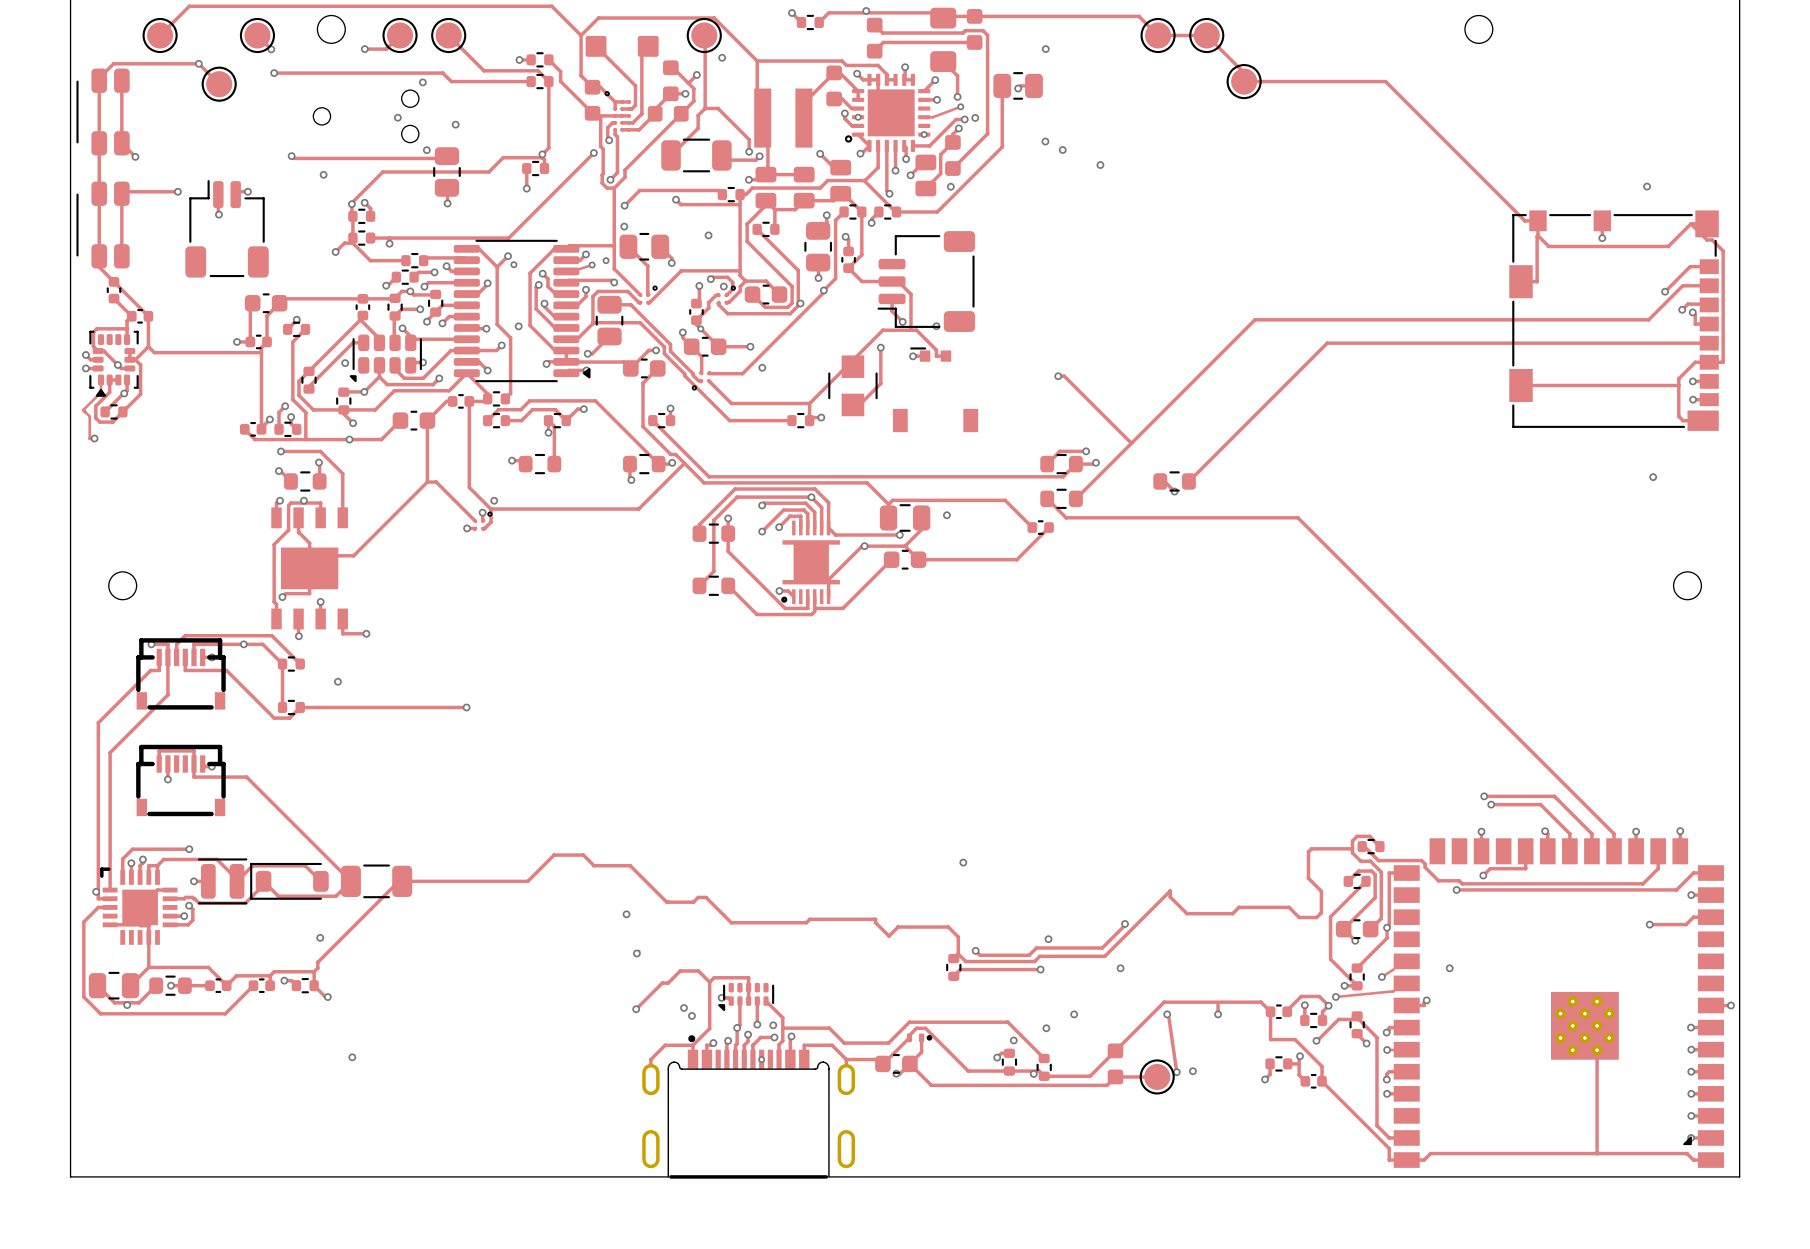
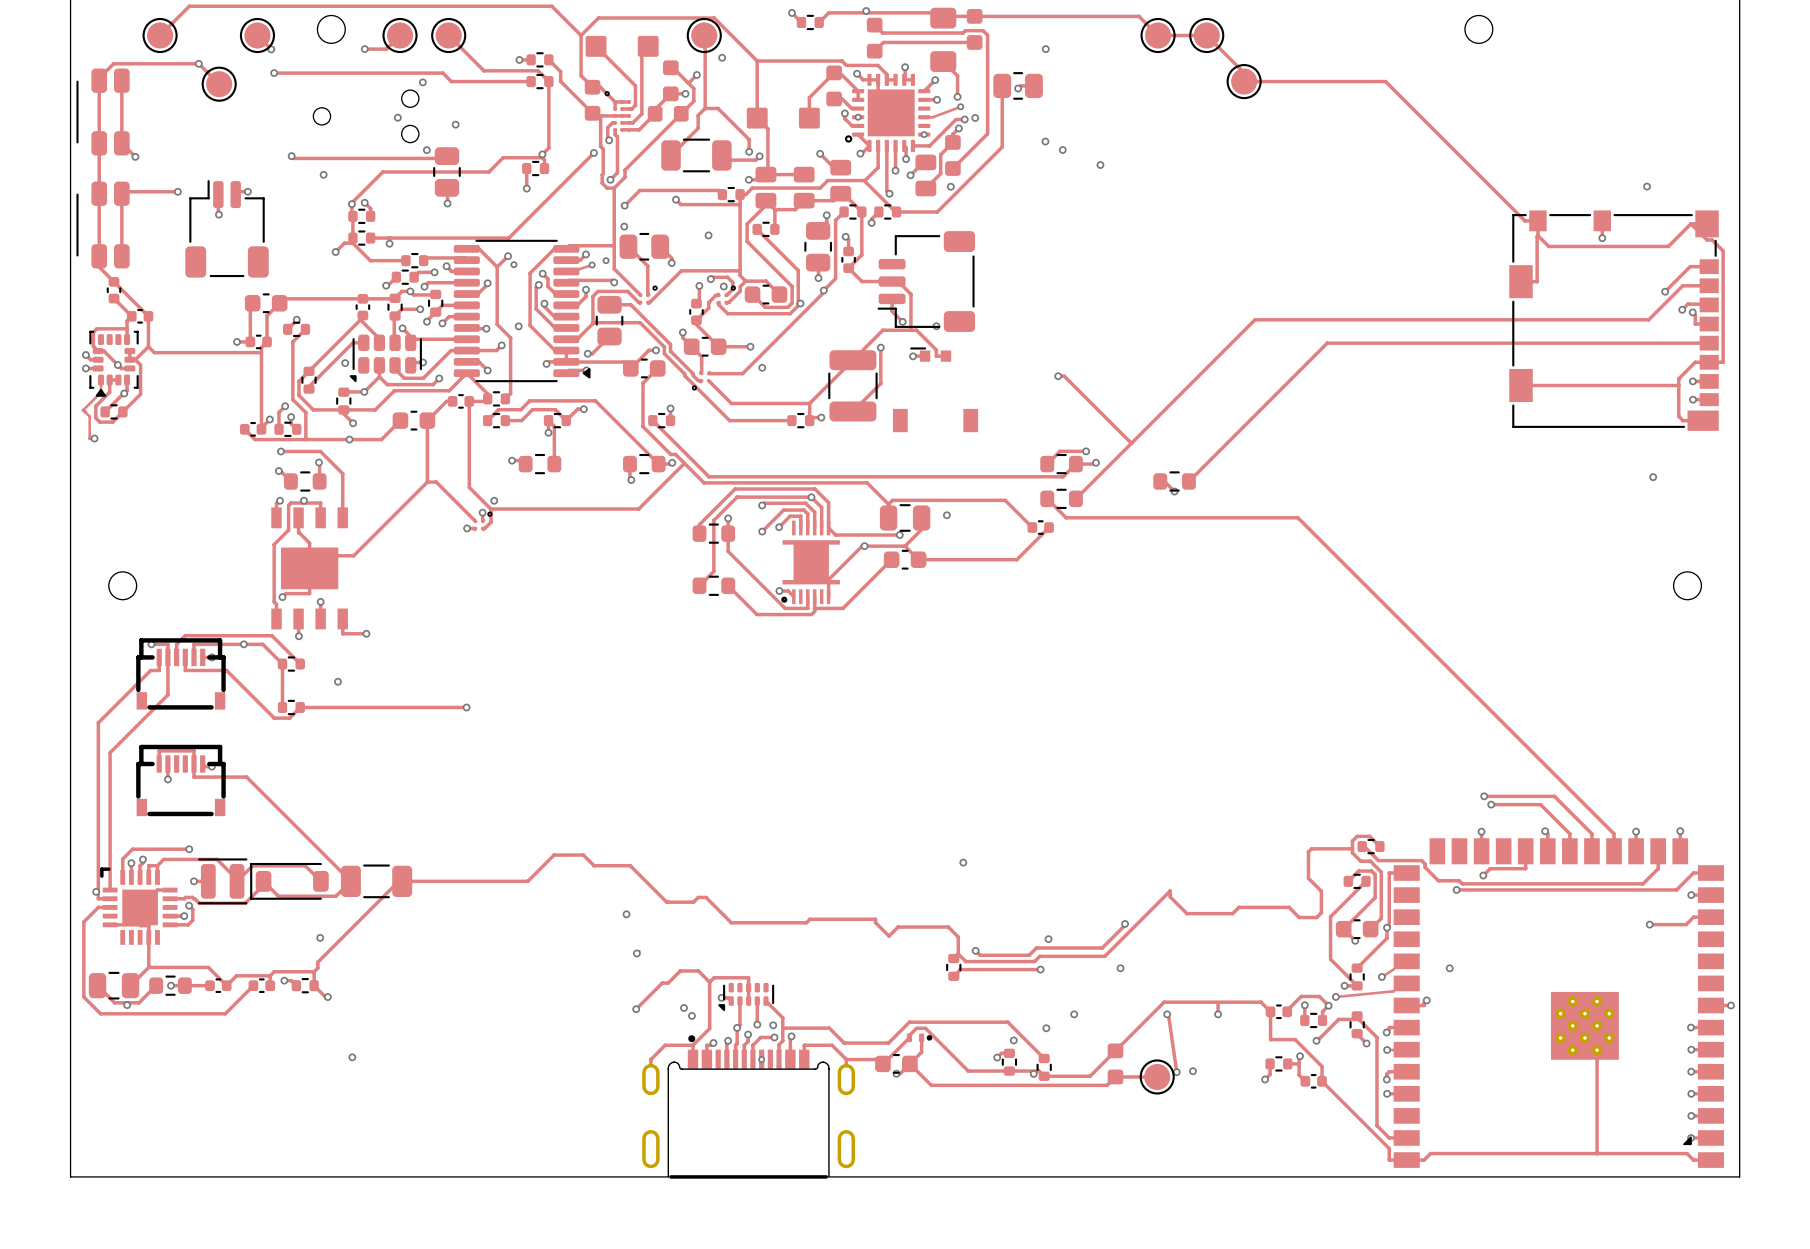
part footprint: [754, 88, 813, 148] -> [746, 107, 820, 129]
via: (700, 328) -> none
part footprint: [828, 355, 878, 417] -> [828, 350, 878, 422]

